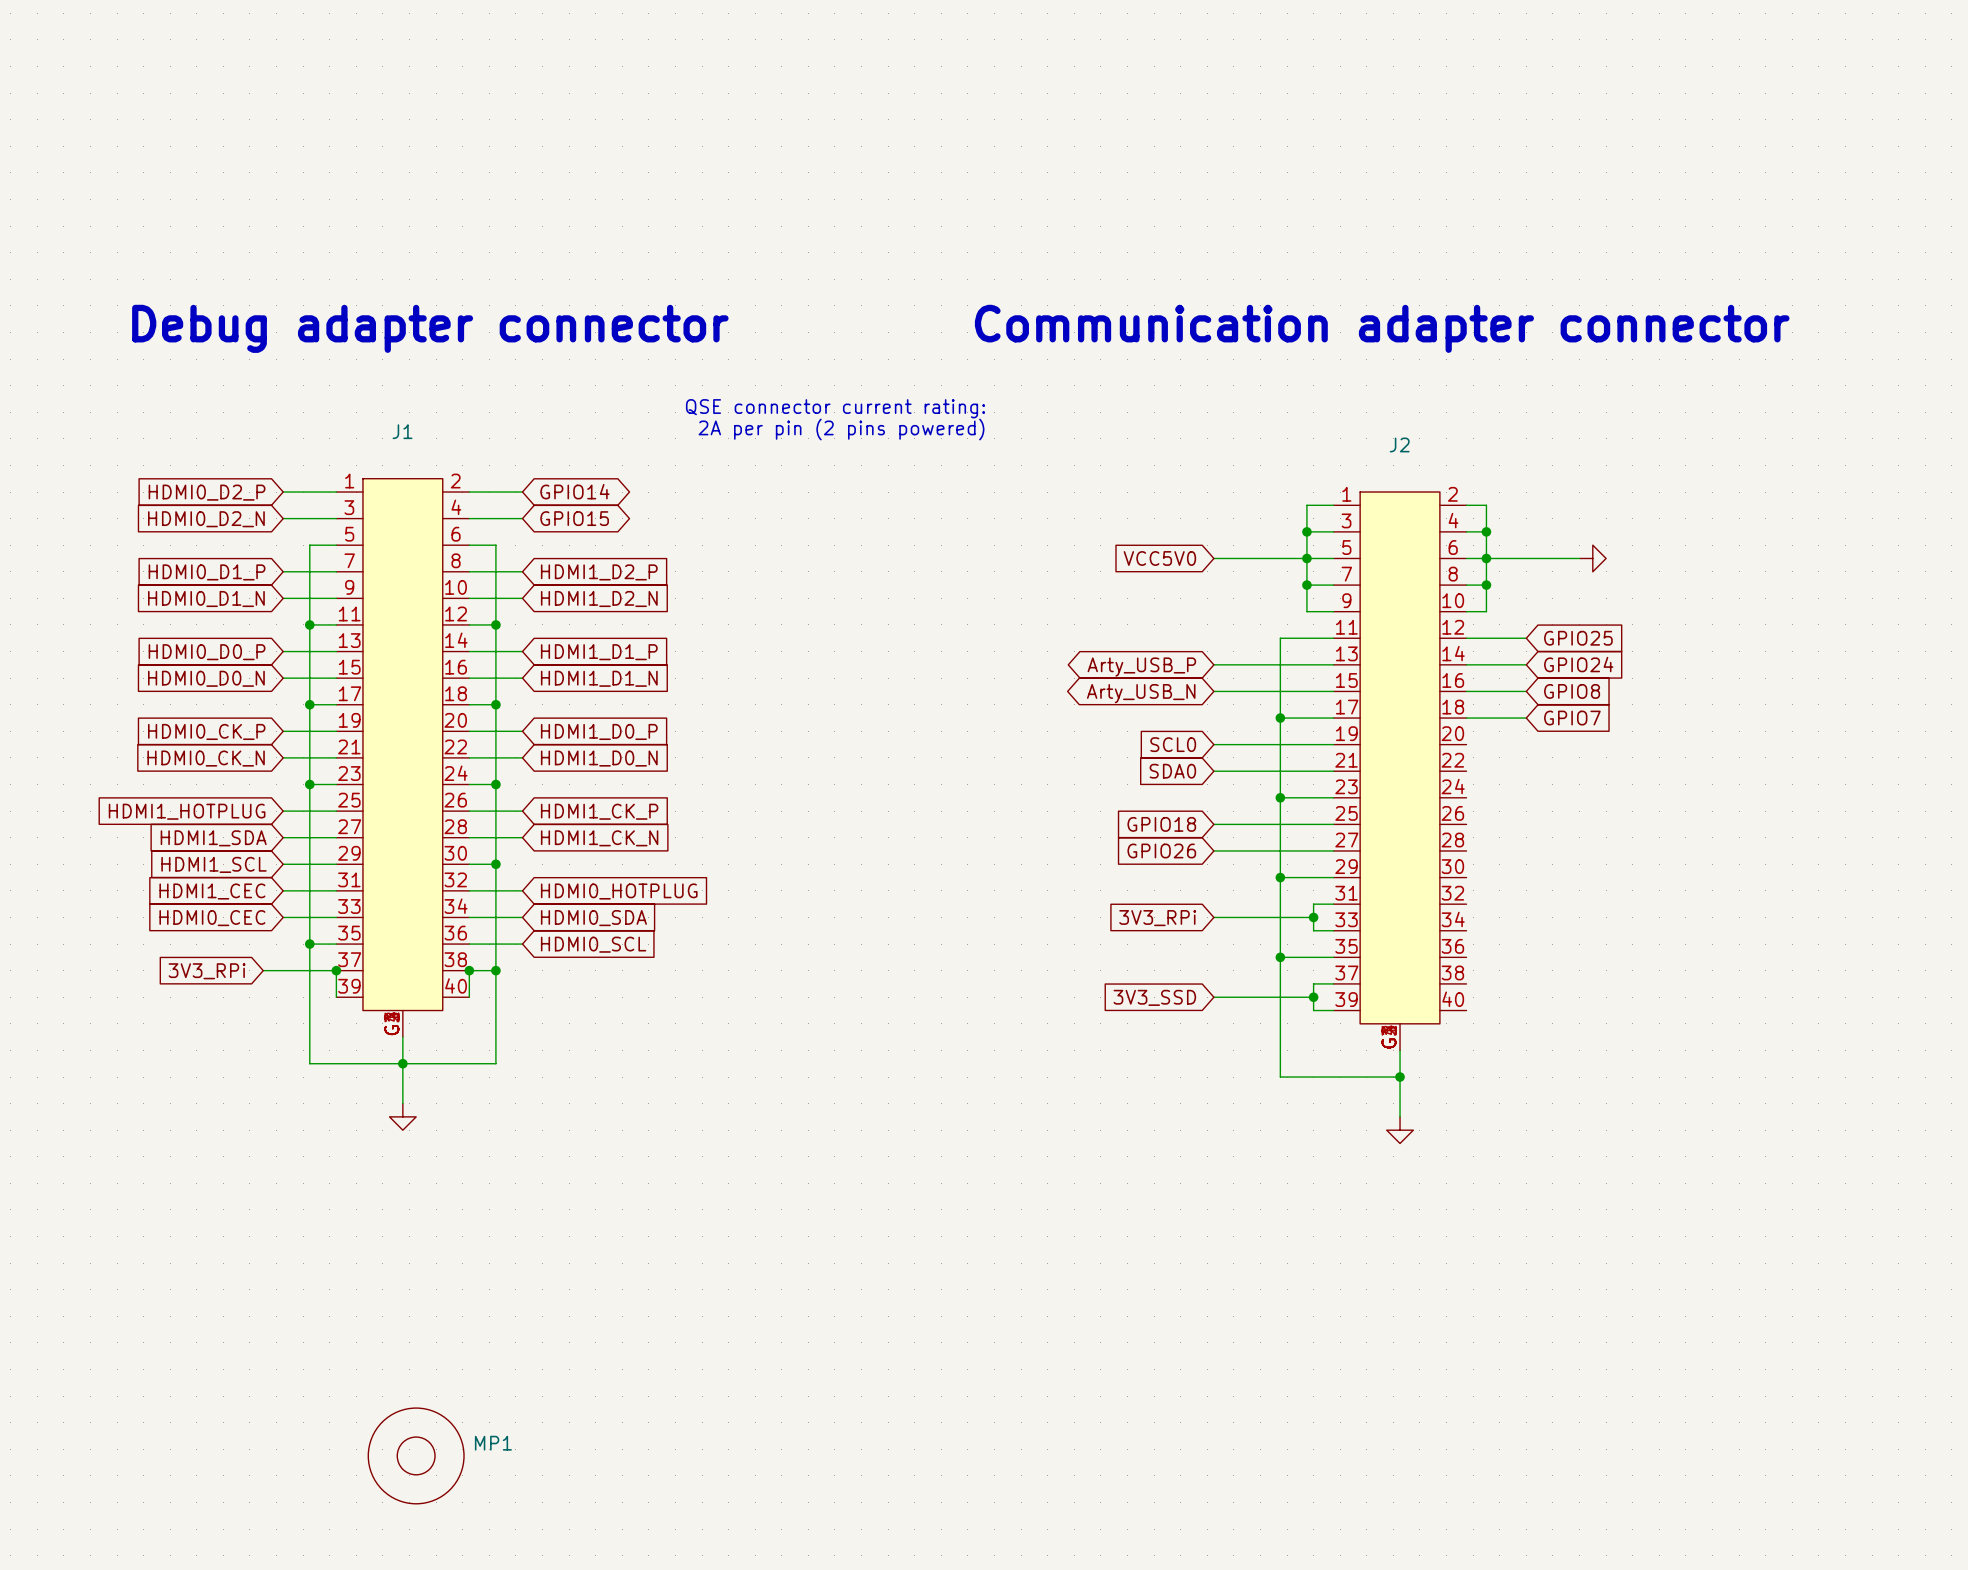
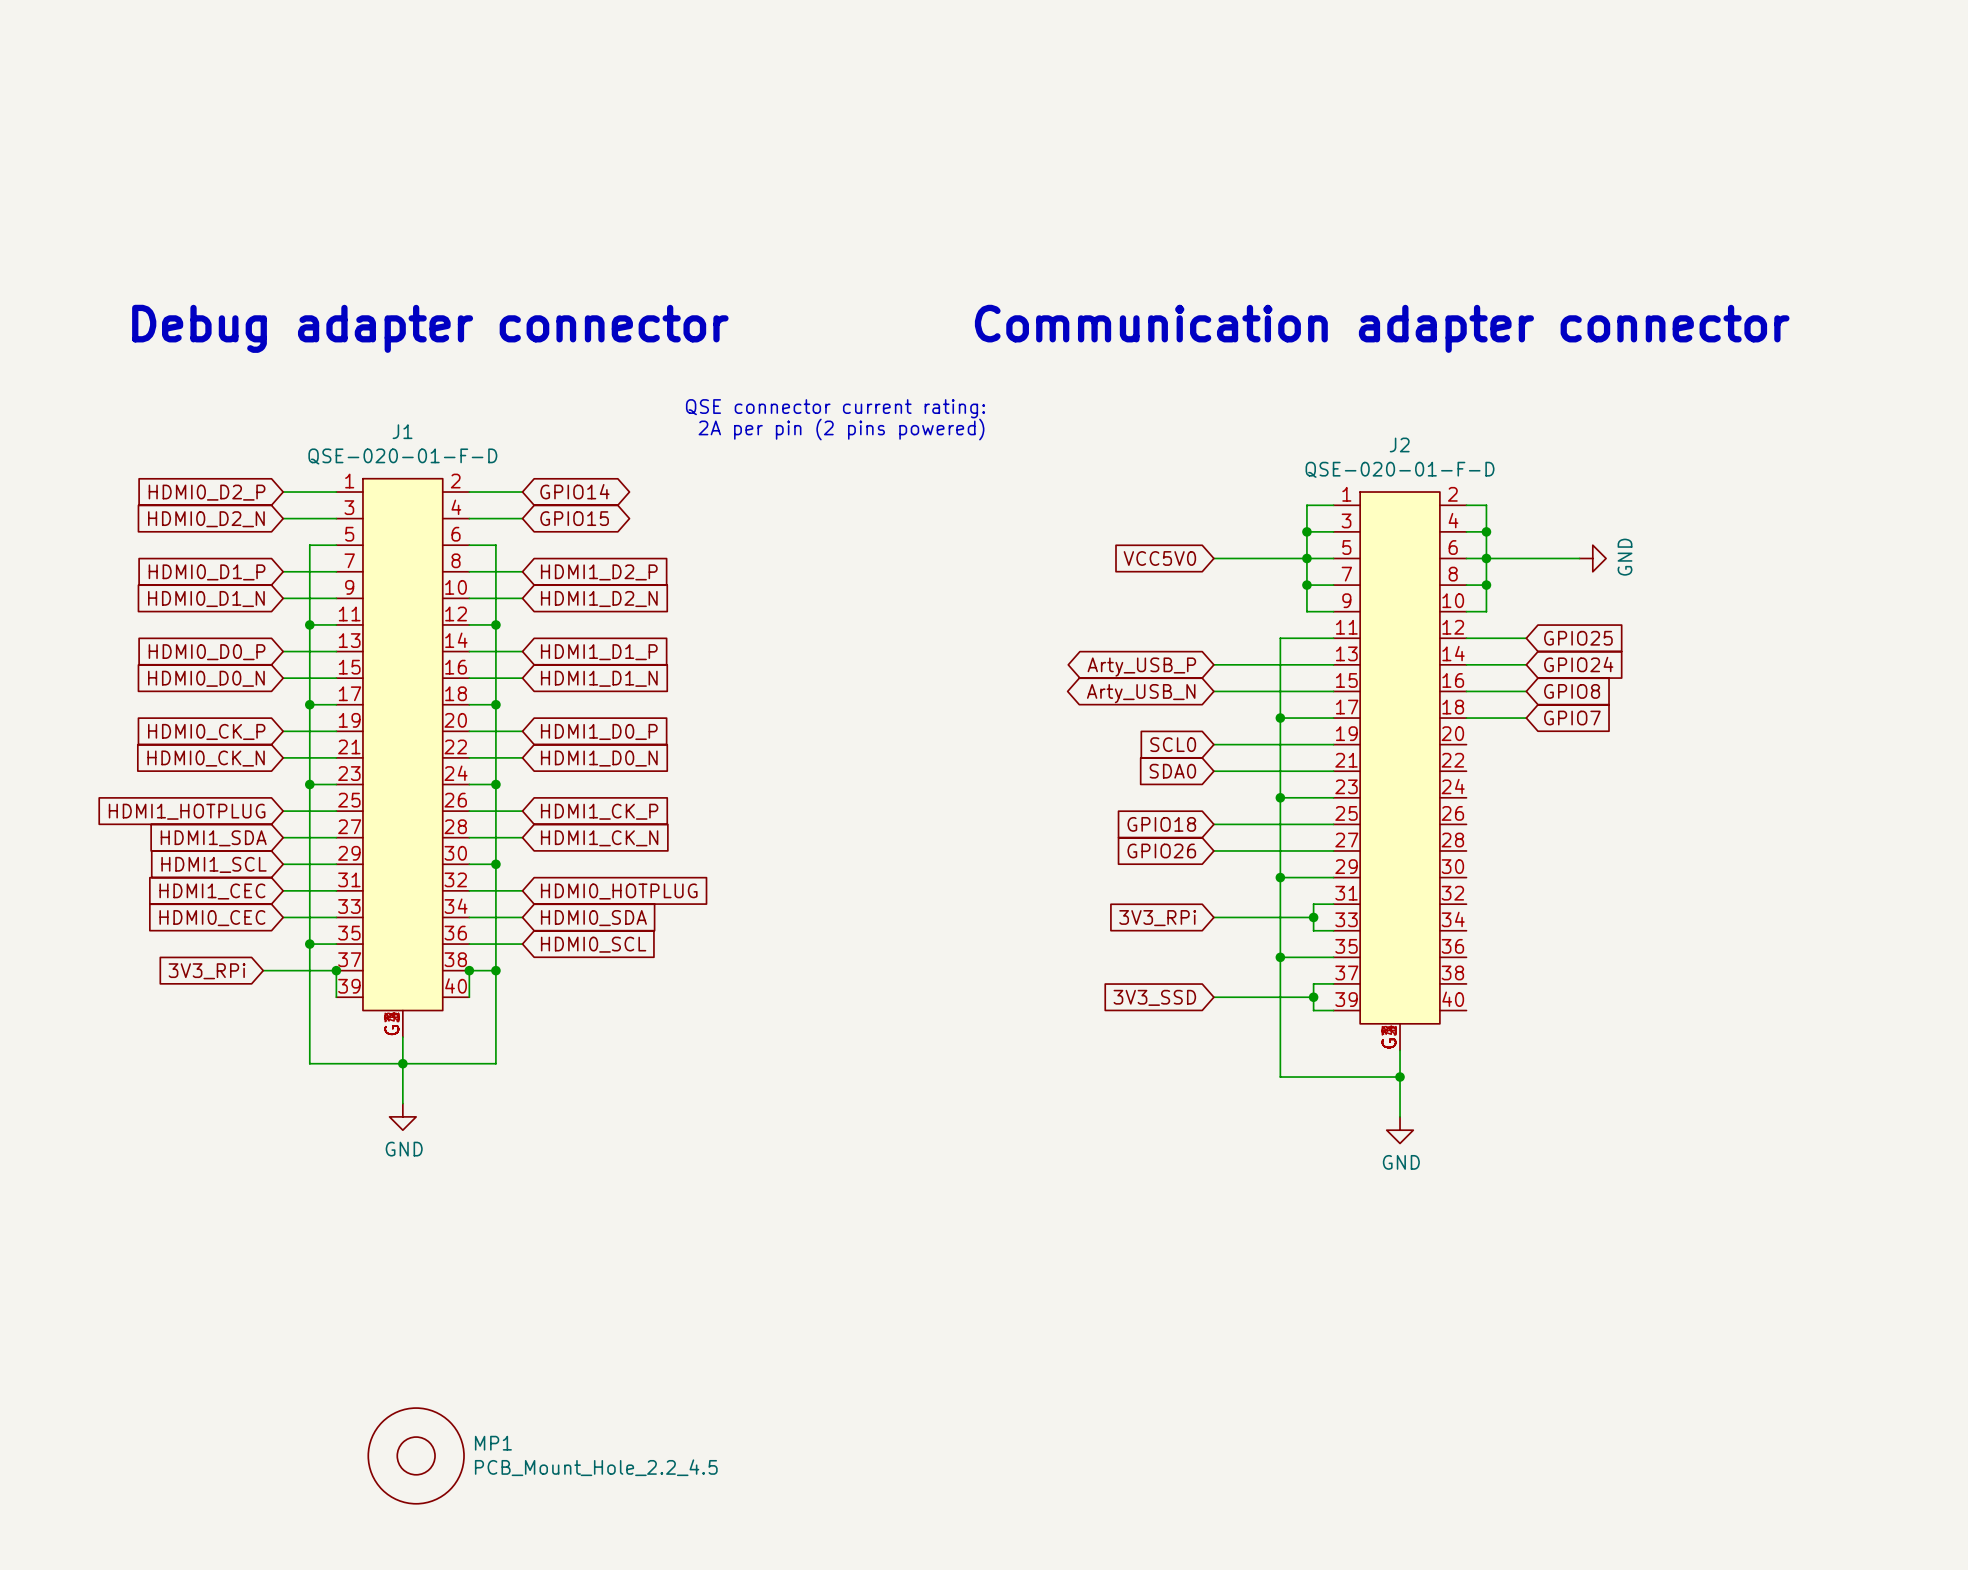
J1 value: none -> QSE-020-01-F-D (402, 456)
J2 value: none -> QSE-020-01-F-D (1400, 469)
power symbol text: none -> GND (1625, 557)
power symbol text: none -> GND (404, 1149)
power symbol text: none -> GND (1401, 1162)
MP1 value: none -> PCB_Mount_Hole_2.2_4.5 (596, 1467)

